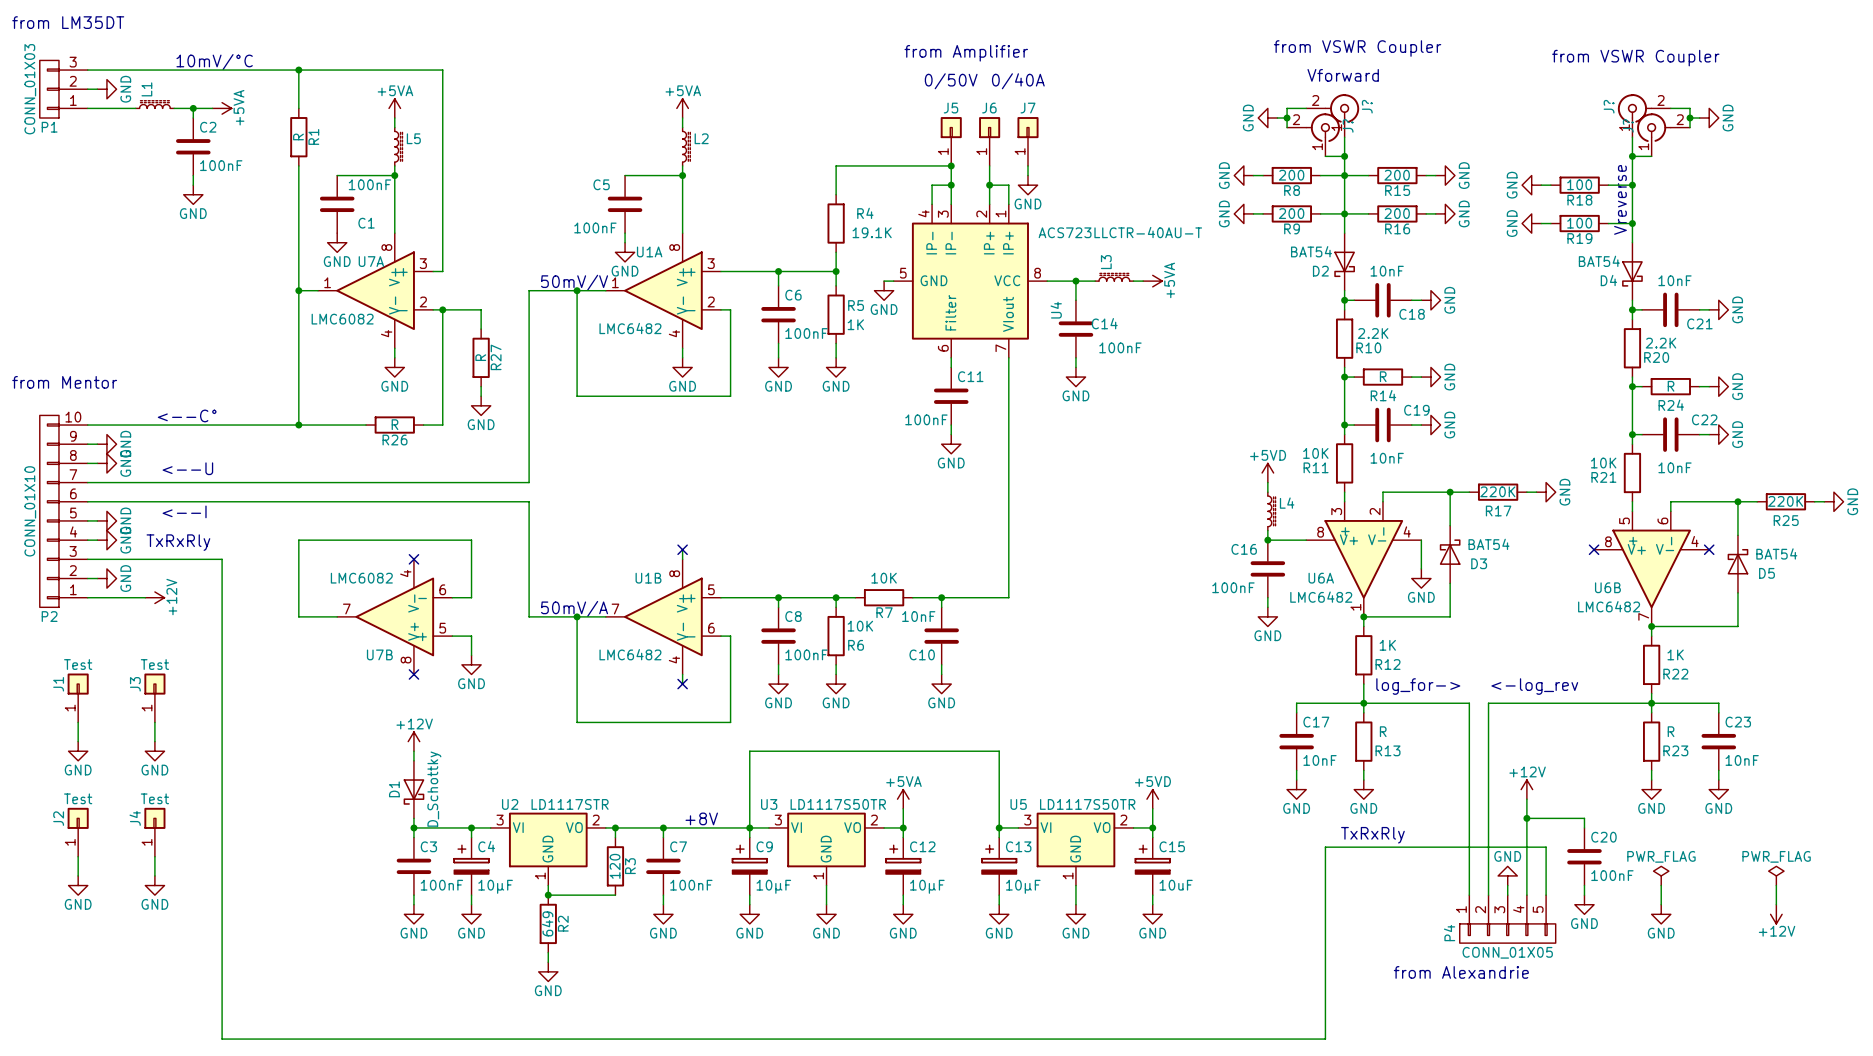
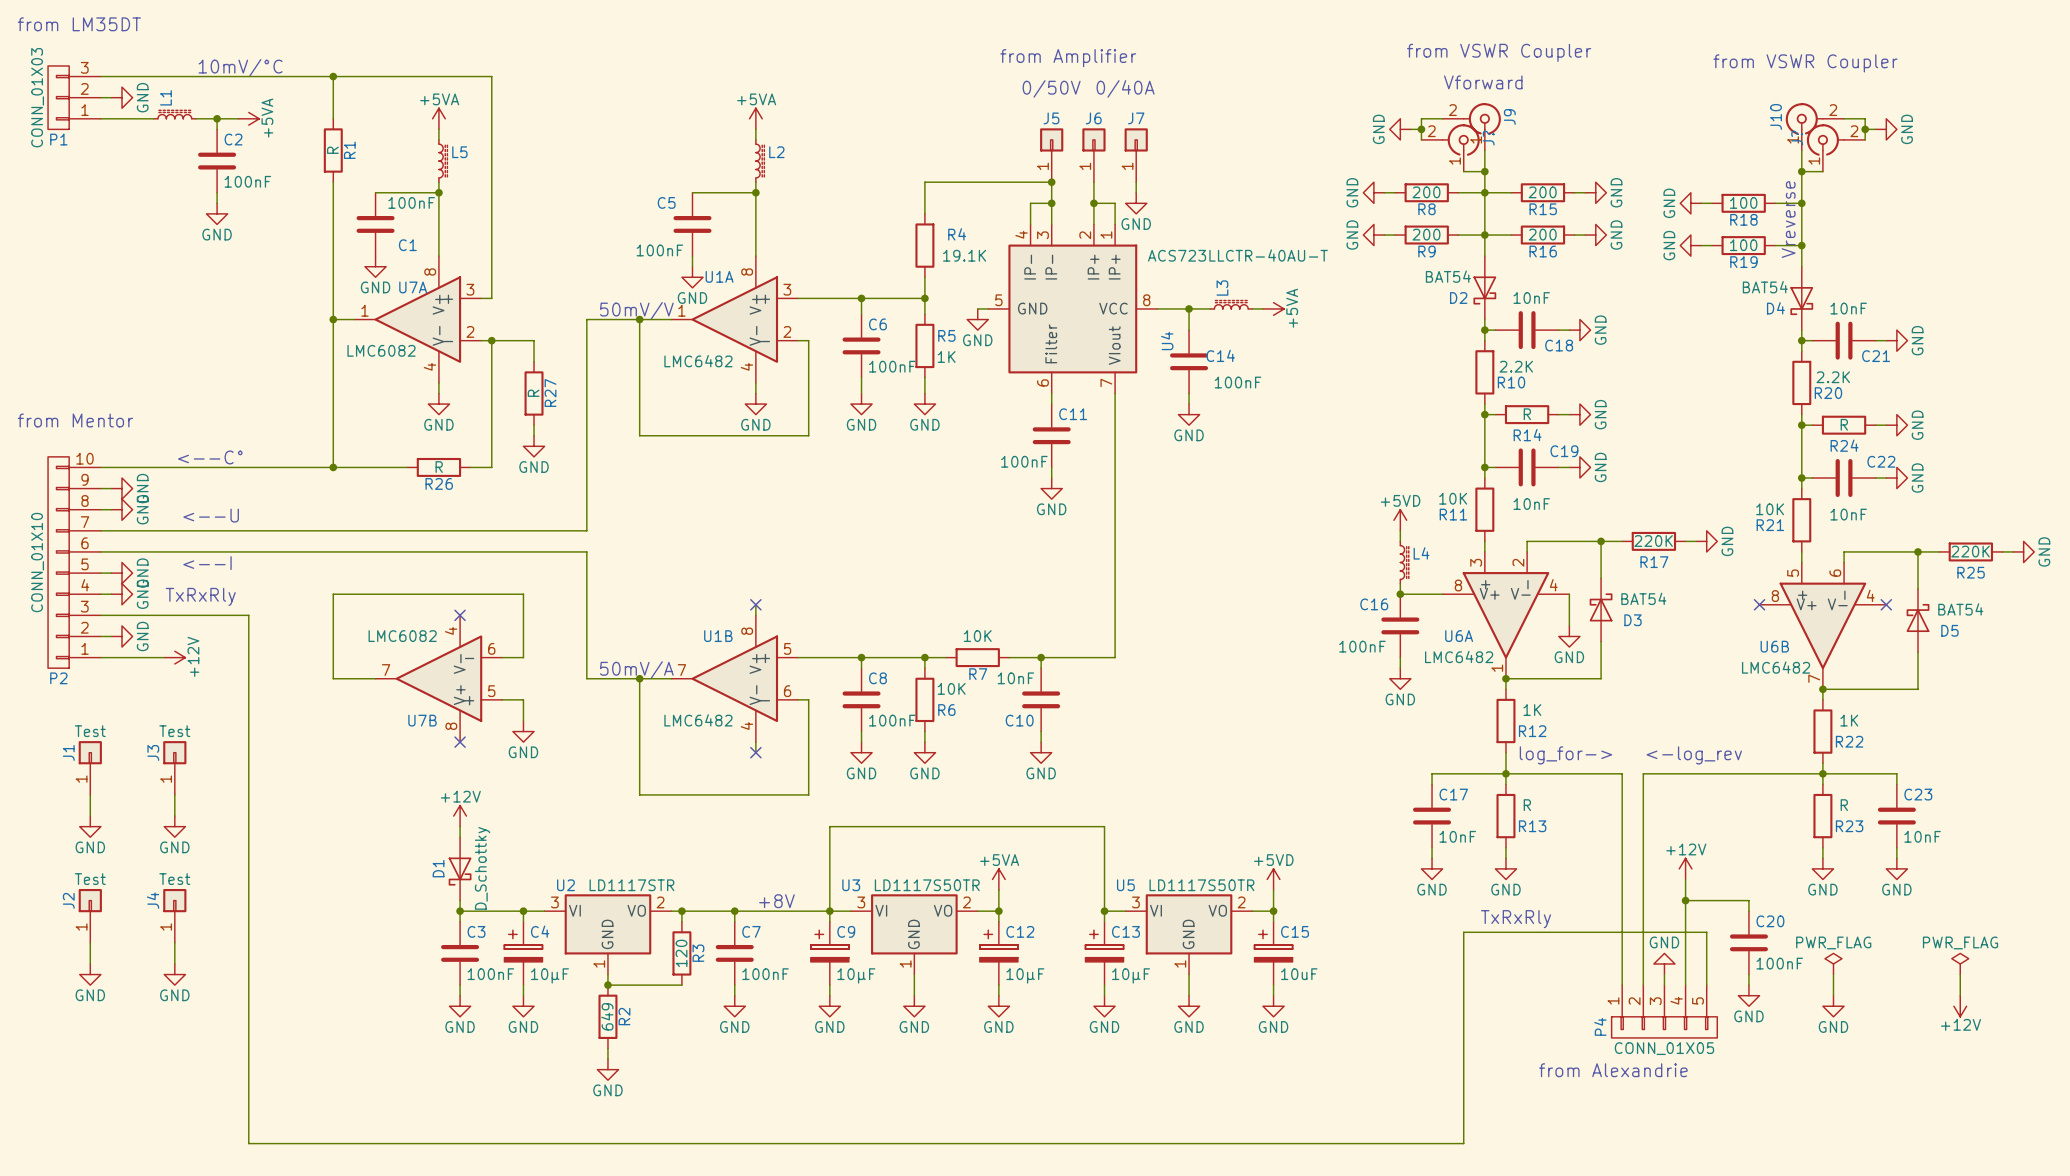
J? name: J? (1367, 106) -> J9 (1509, 116)
J? name: J? (1609, 106) -> J10 (1776, 116)

